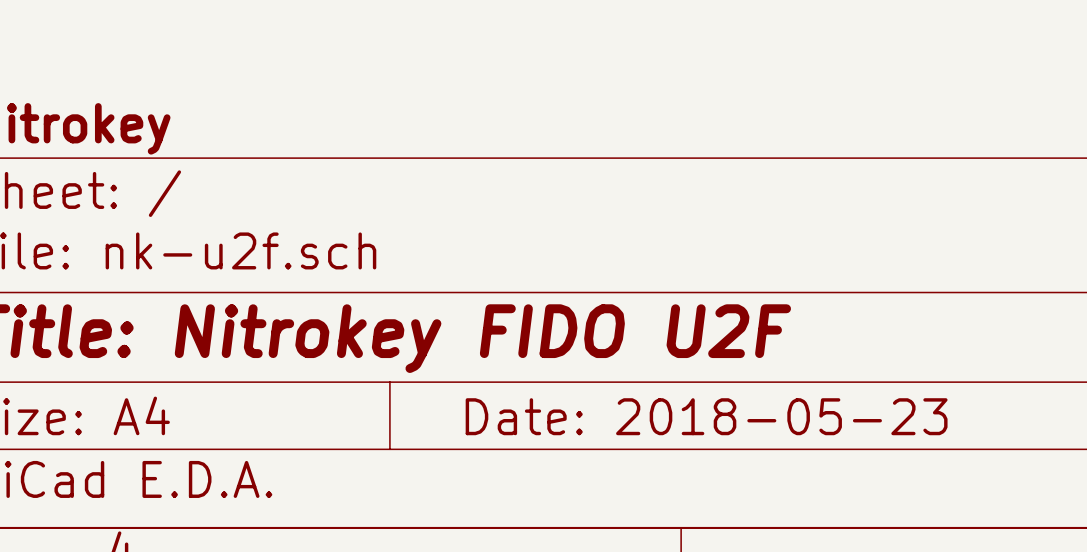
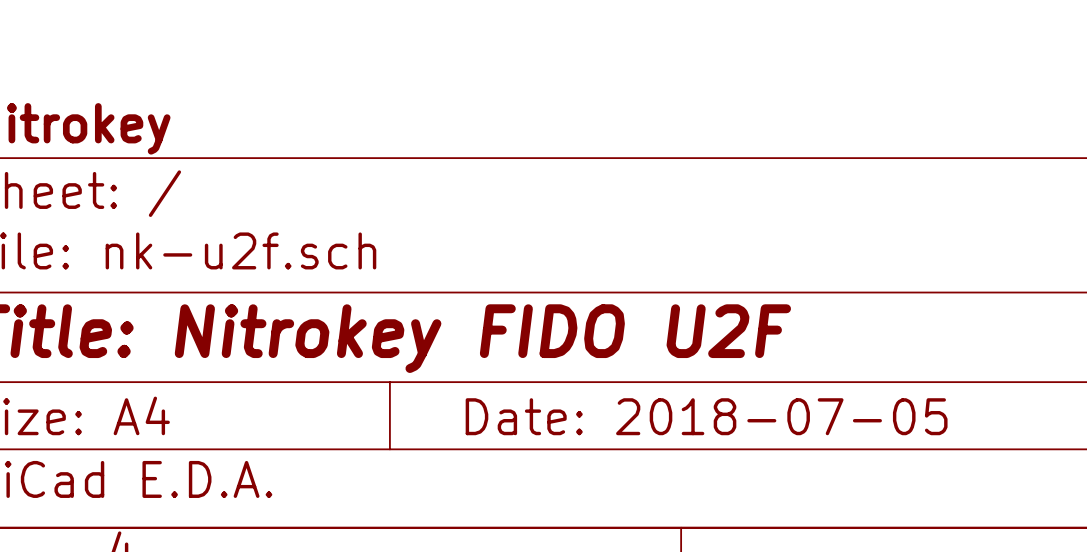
title block: Date: 2018-05-23 (706, 416) -> Date: 2018-07-05 (706, 416)

